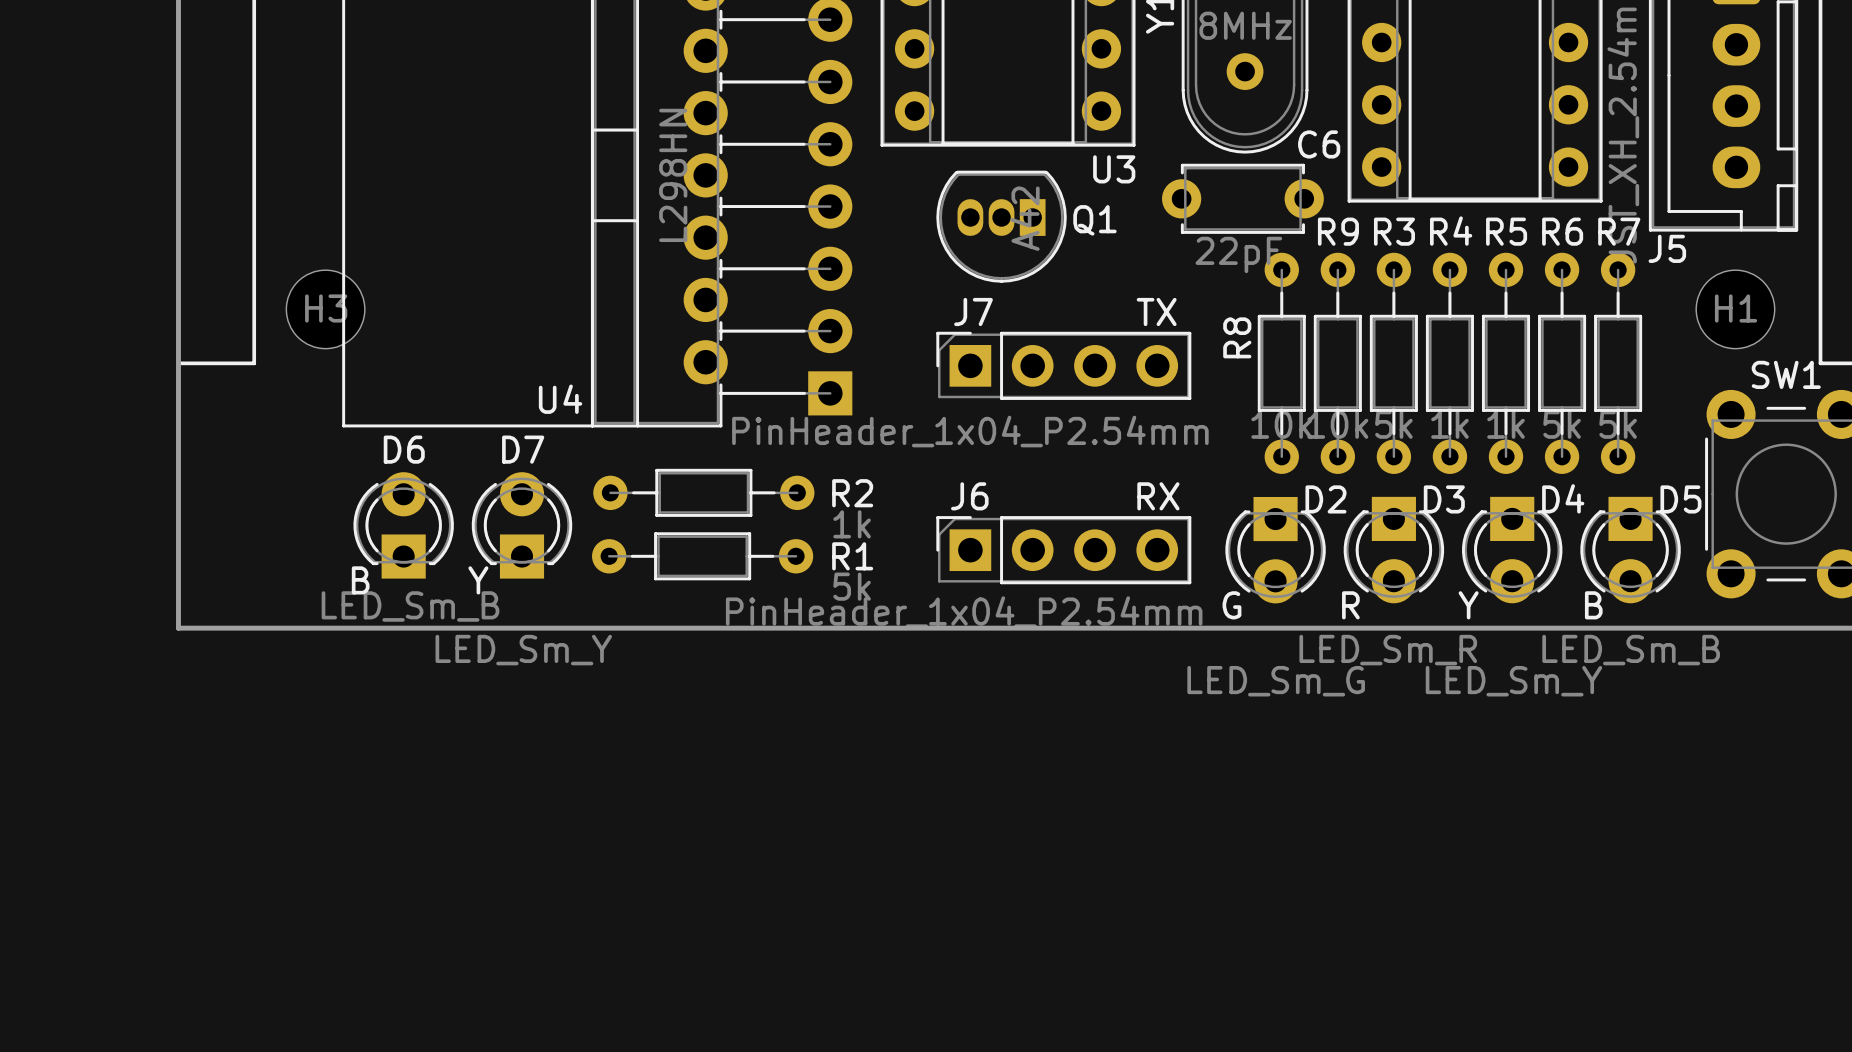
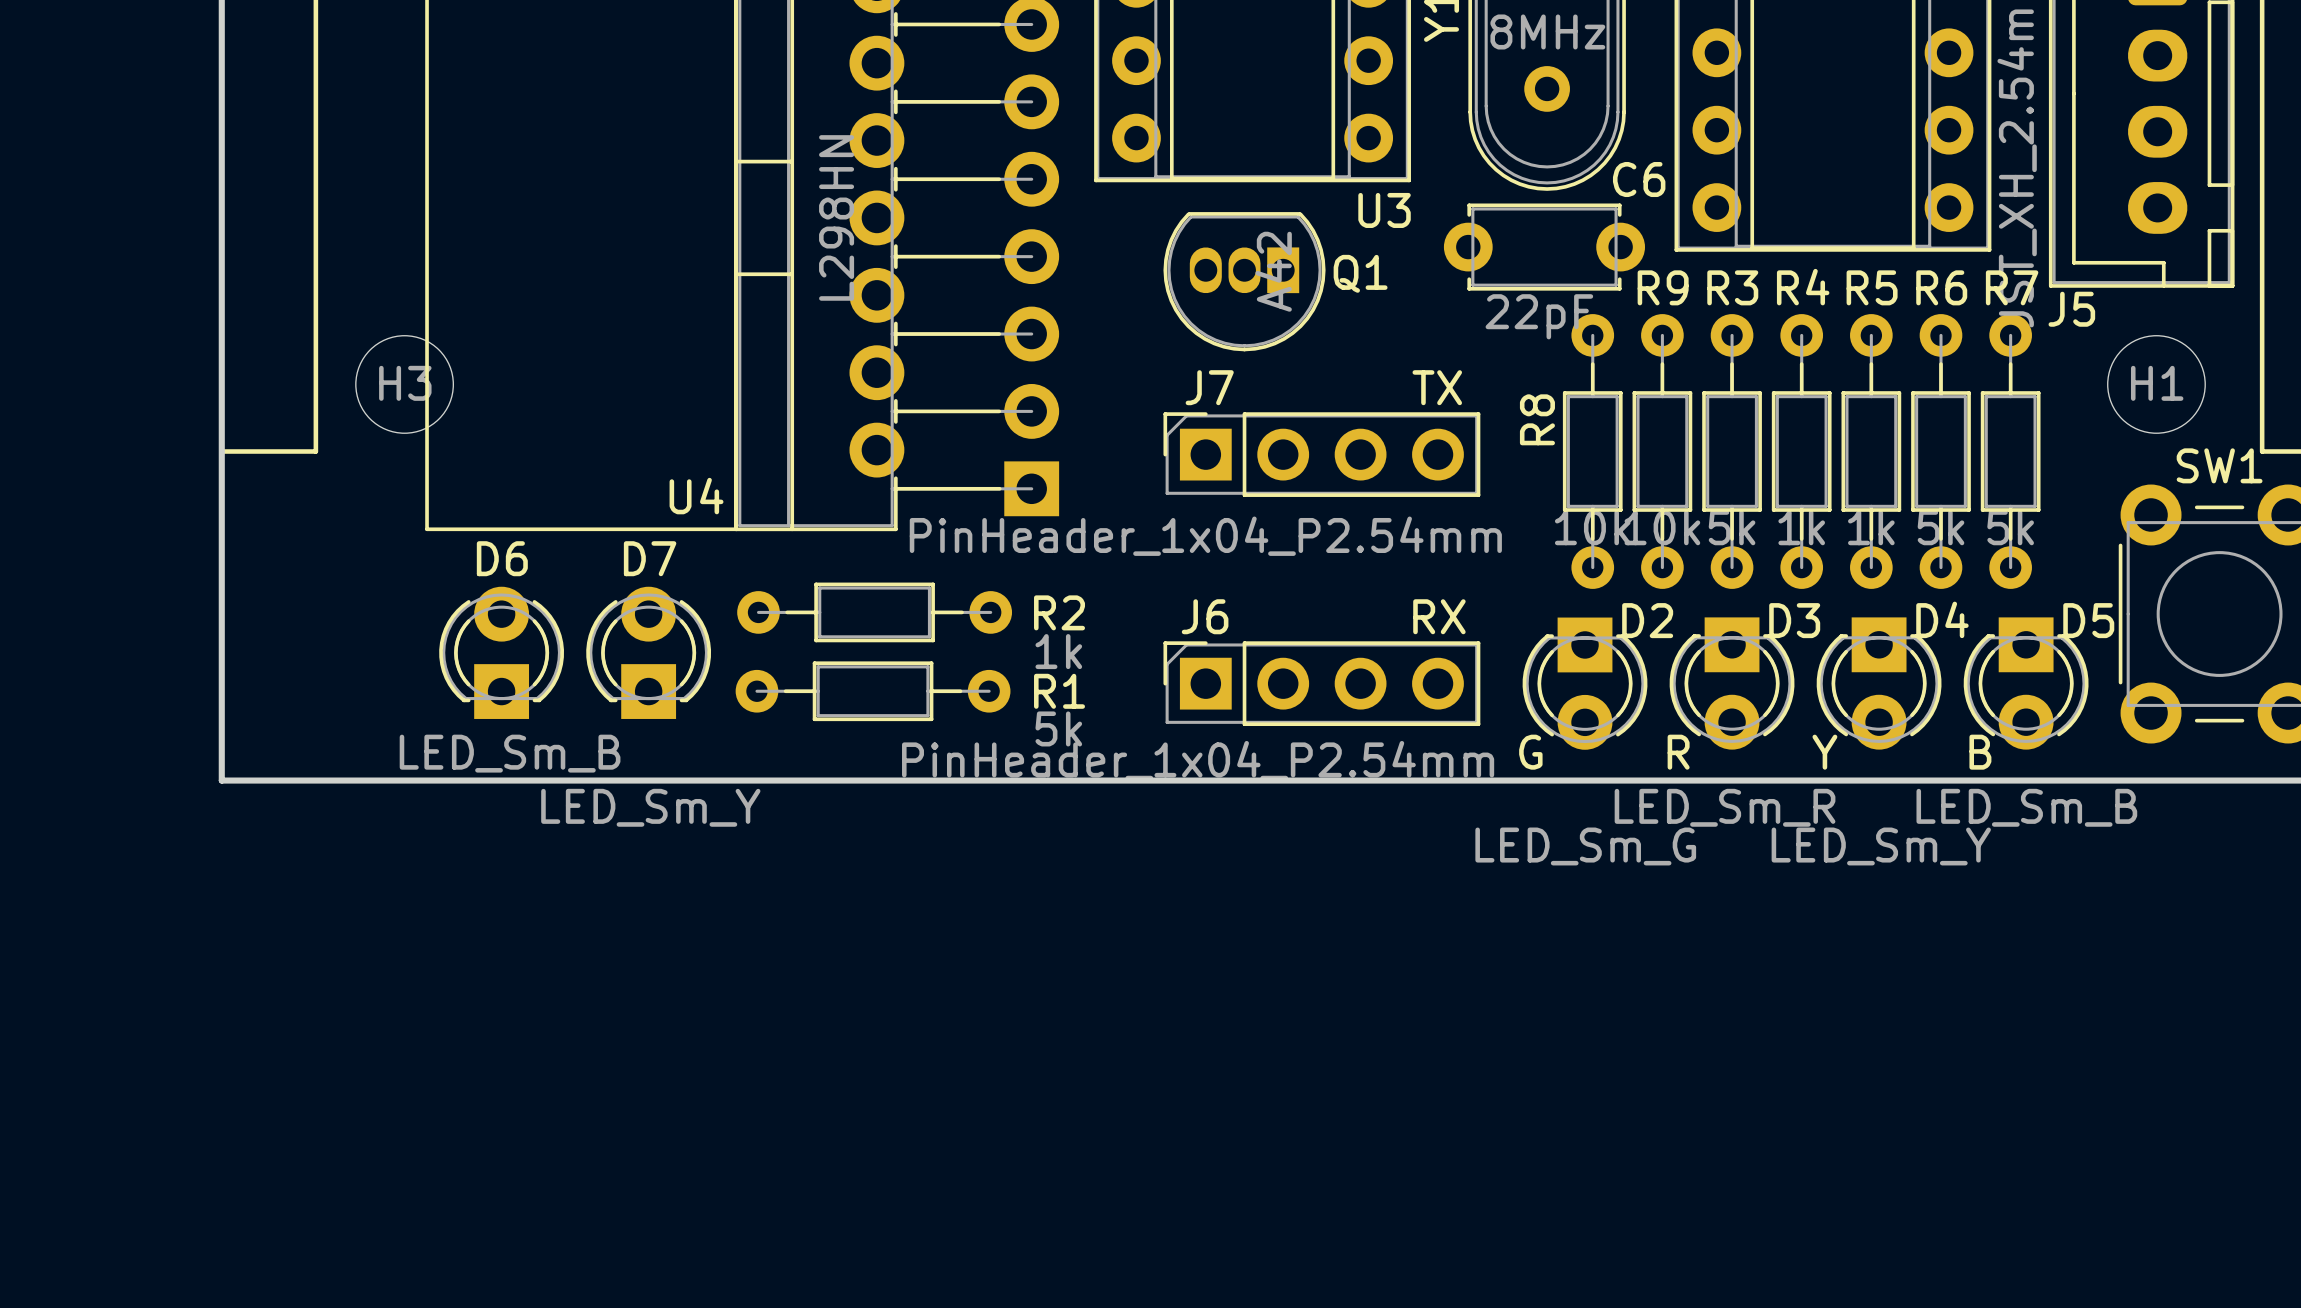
D6 text: B (360, 580) -> none
D7 text: Y (478, 580) -> none

